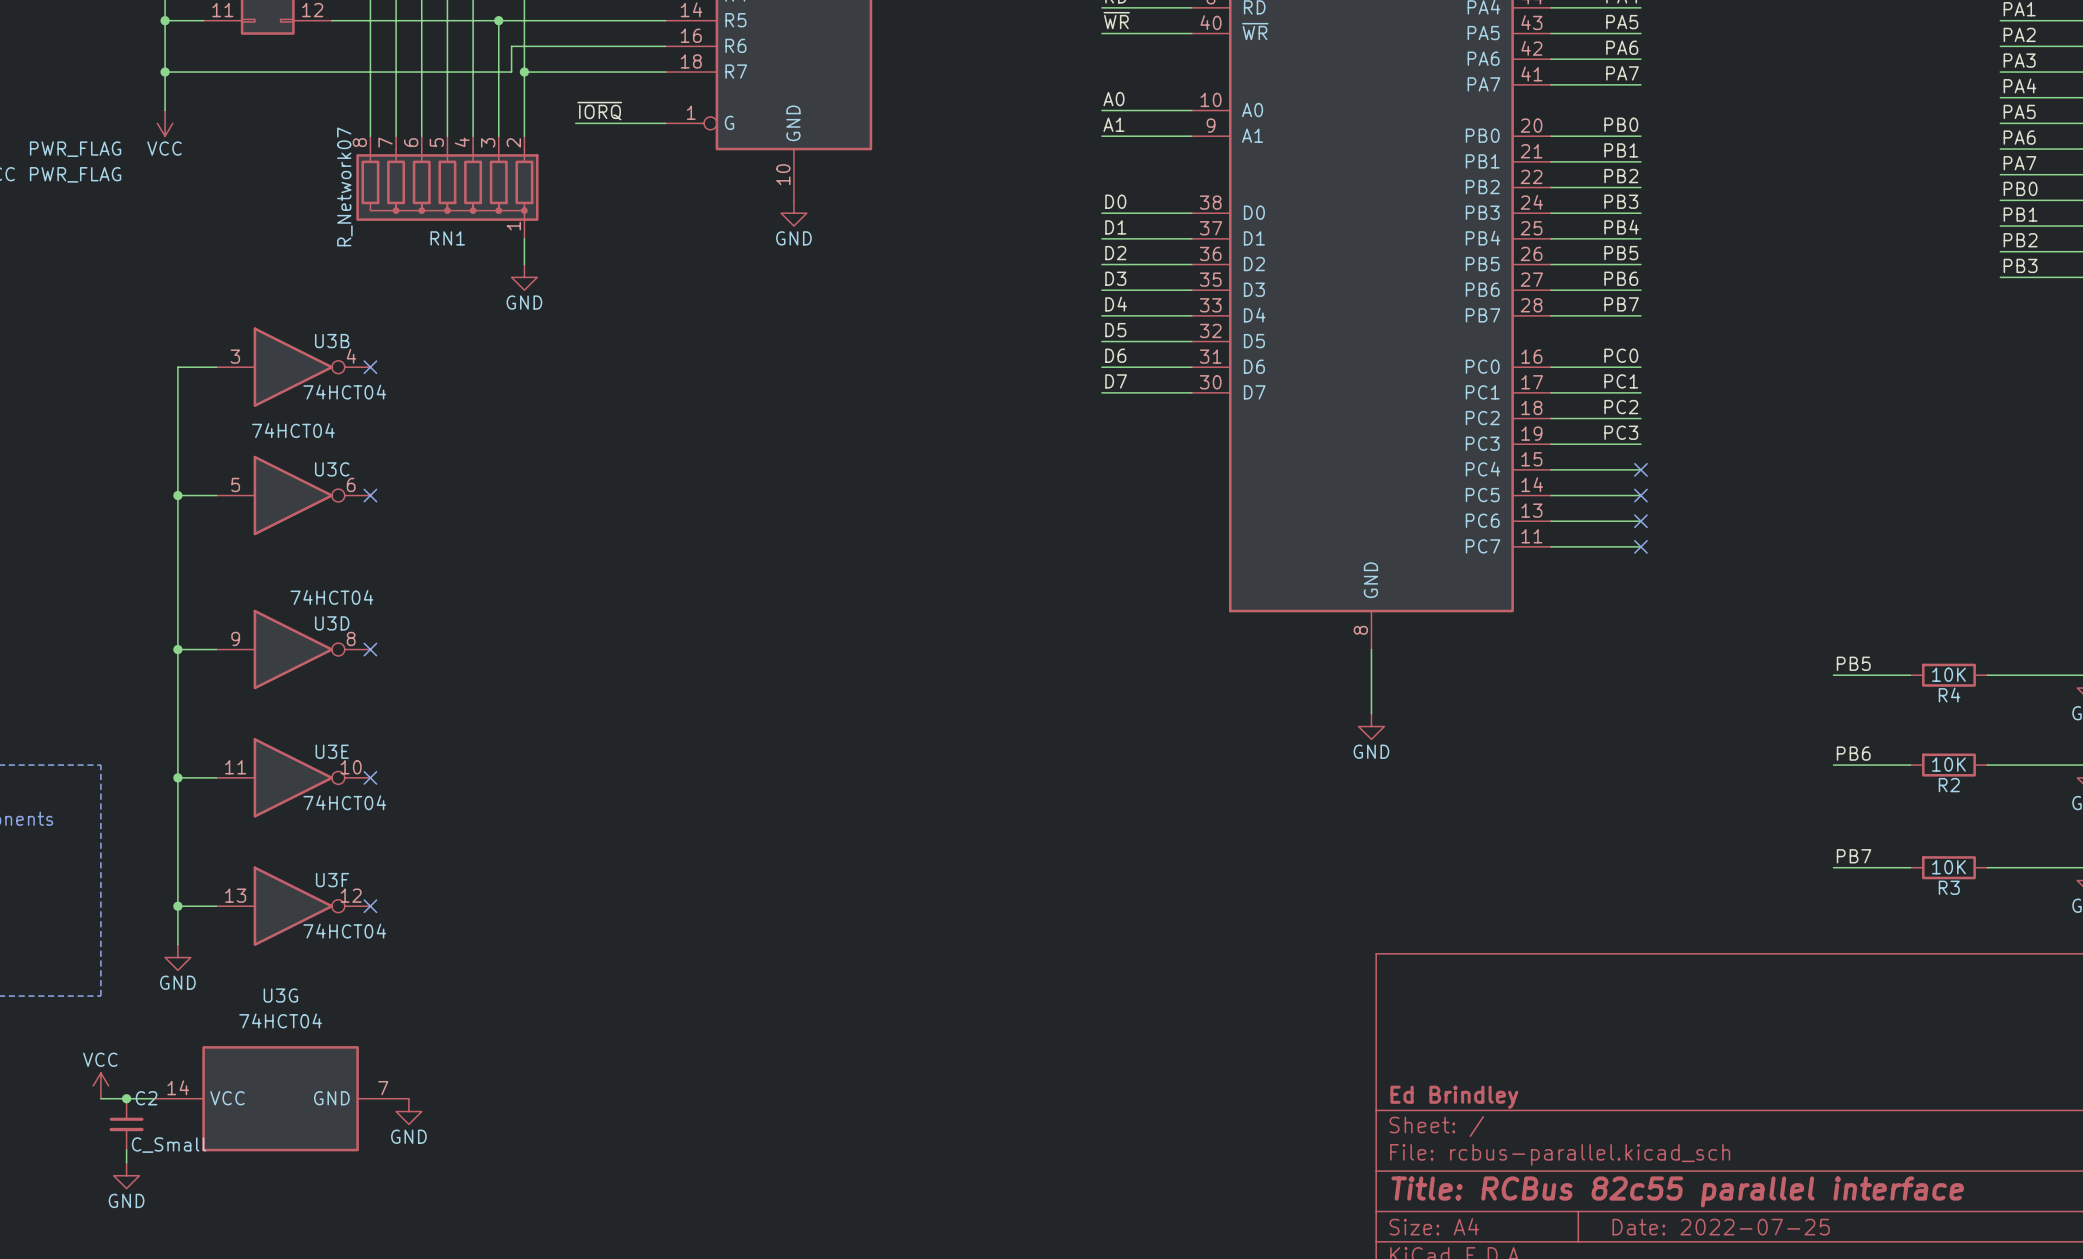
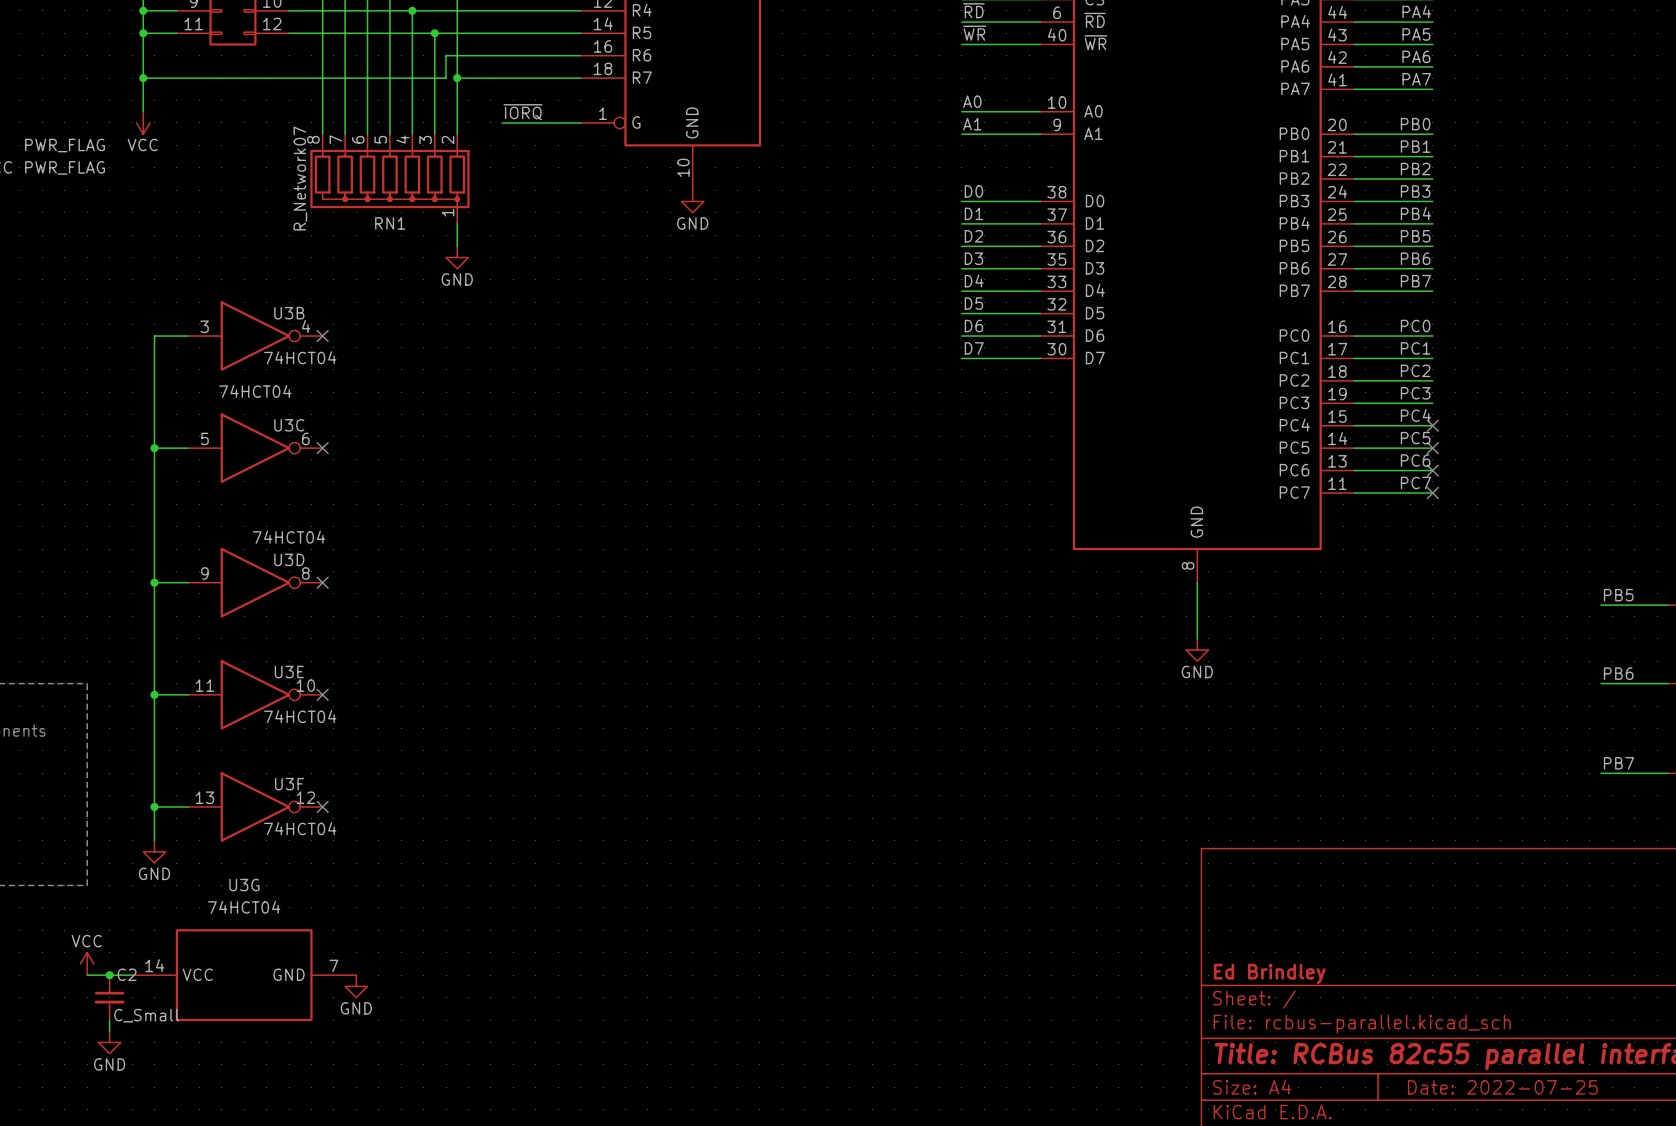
label: none -> PC4 (1415, 415)
label: none -> PC5 (1415, 438)
label: none -> PC6 (1415, 460)
label: none -> PC7 (1415, 483)

